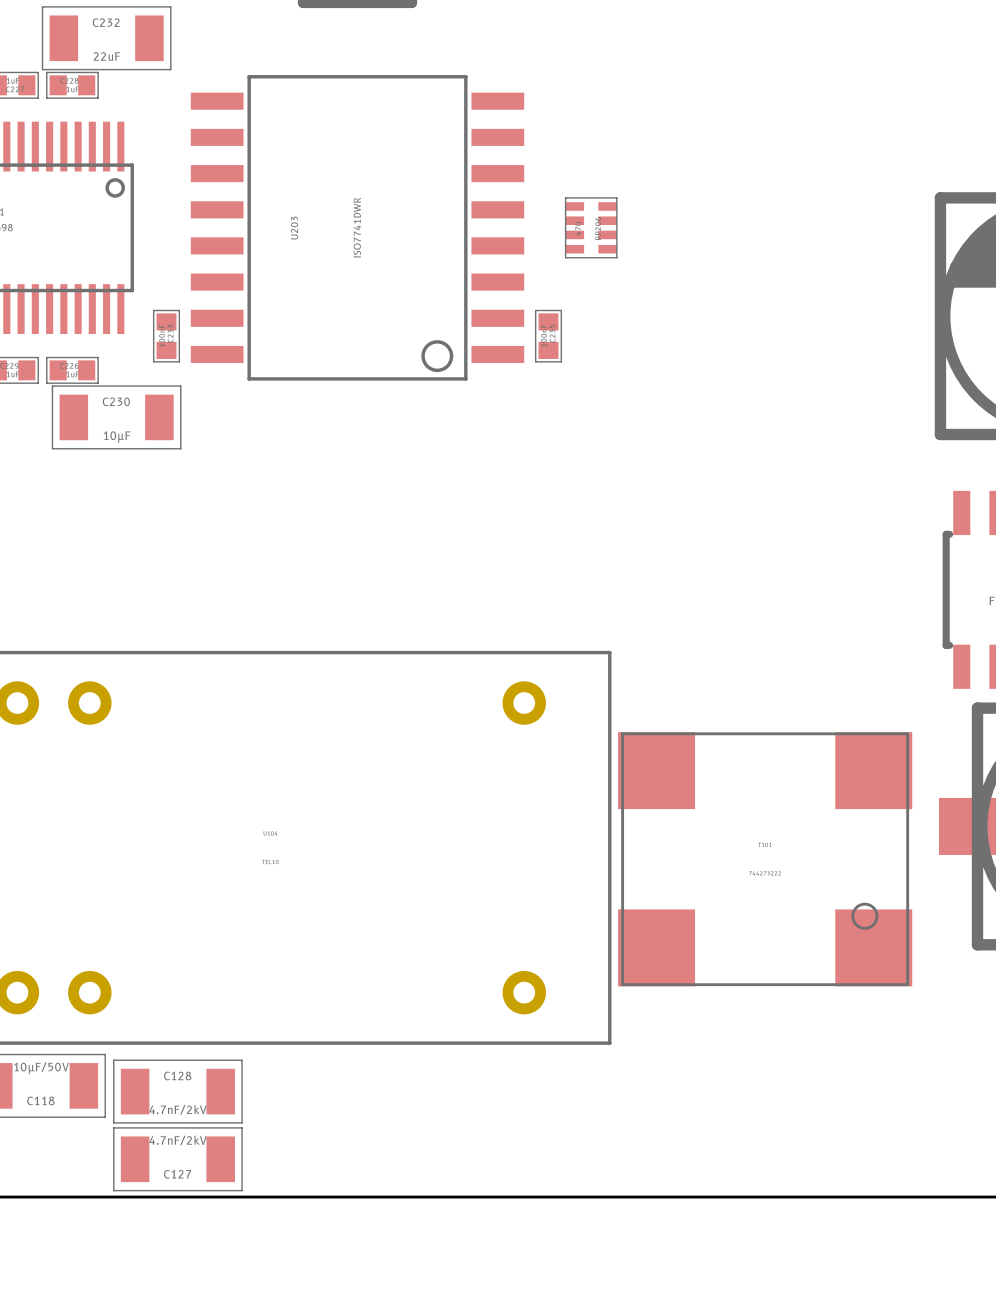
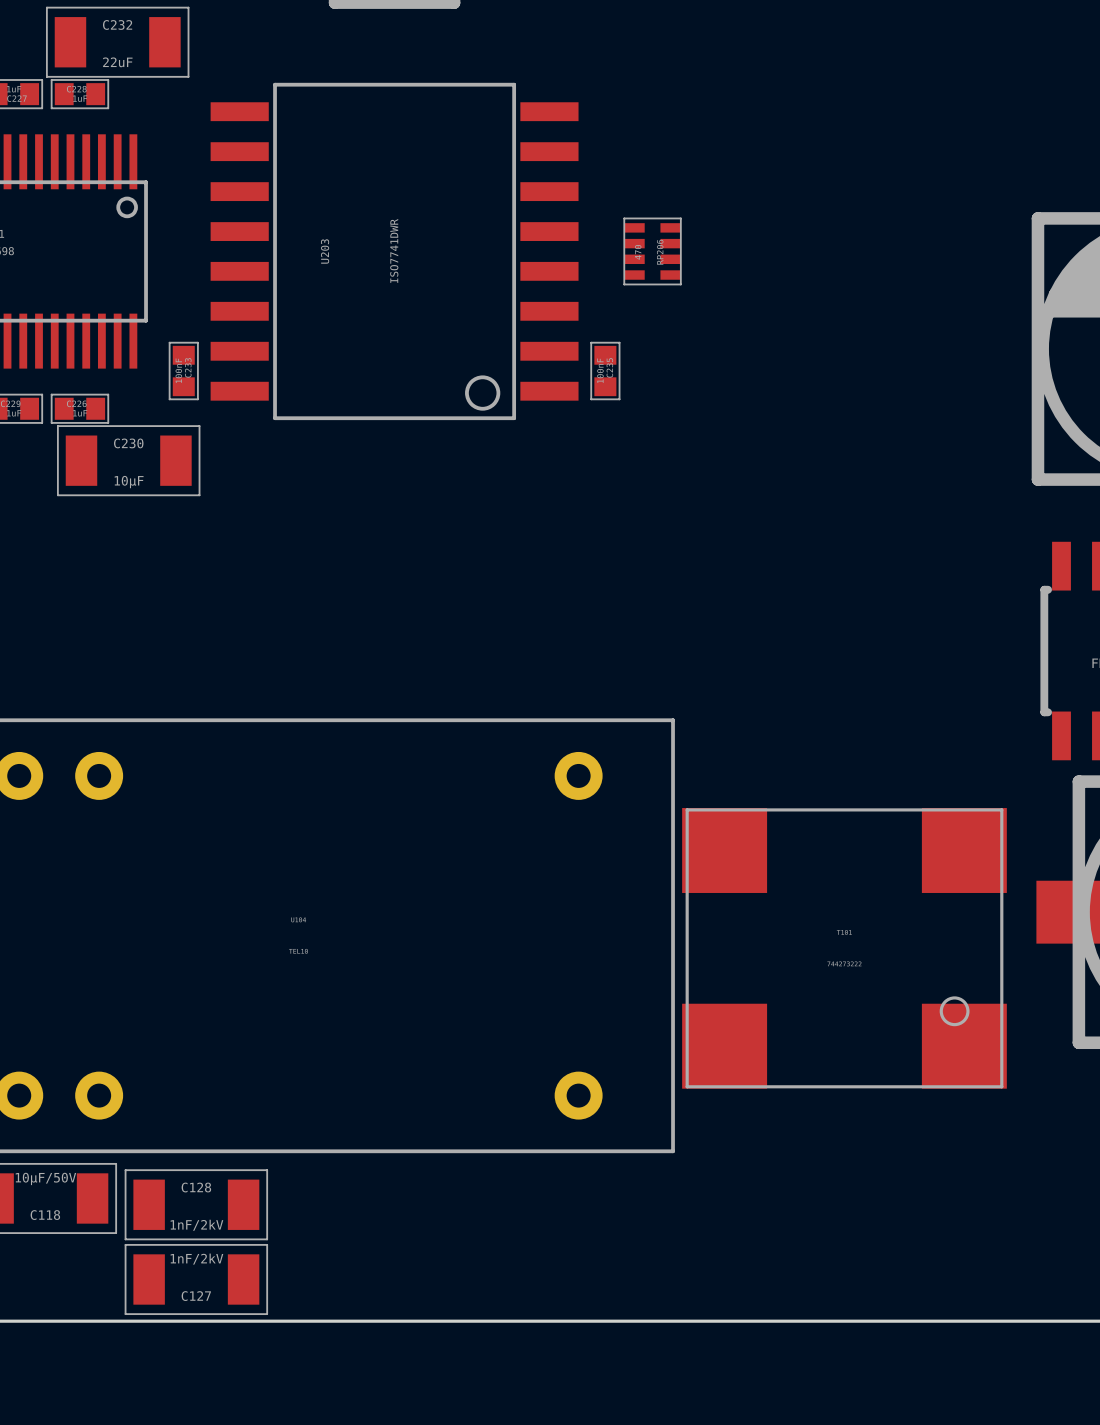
C128 value: 4.7nF/2kV (178, 1109) -> 1nF/2kV (196, 1225)
C127 value: 4.7nF/2kV (178, 1140) -> 1nF/2kV (196, 1259)

